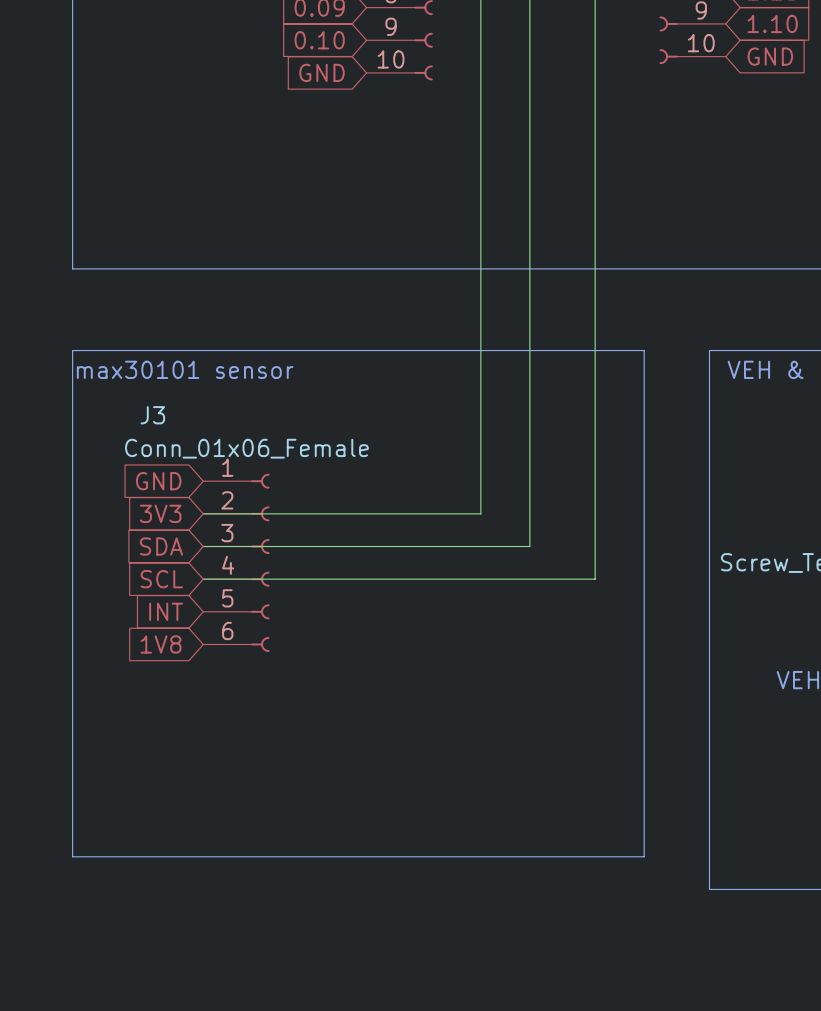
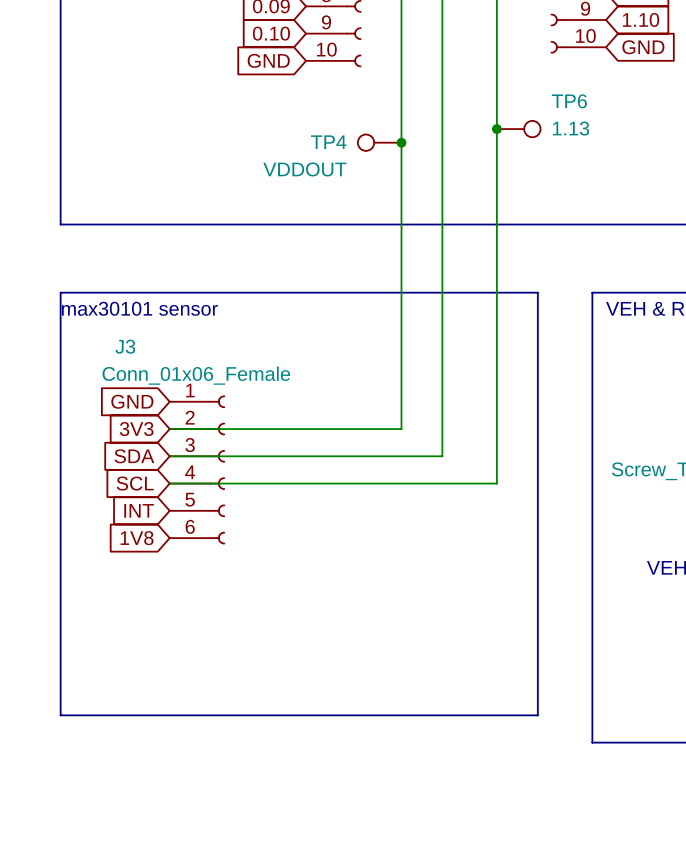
junction: none -> (496, 129)
TP6: none -> 1.13 (518, 129)
TP4: none -> VDDOUT (379, 142)
junction: none -> (401, 142)

